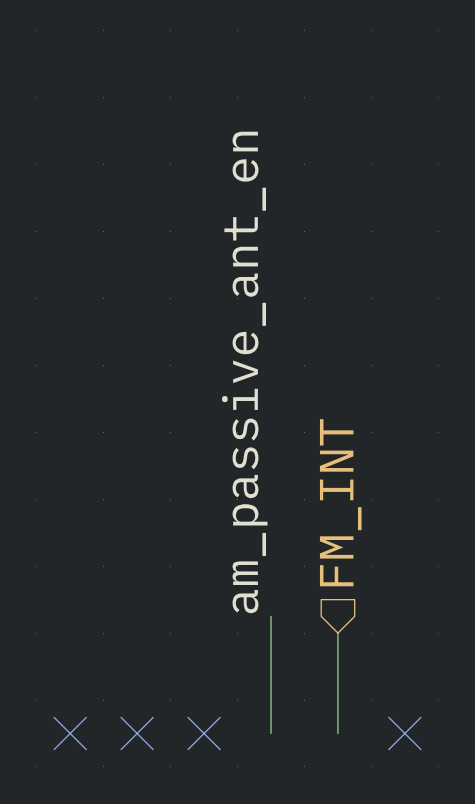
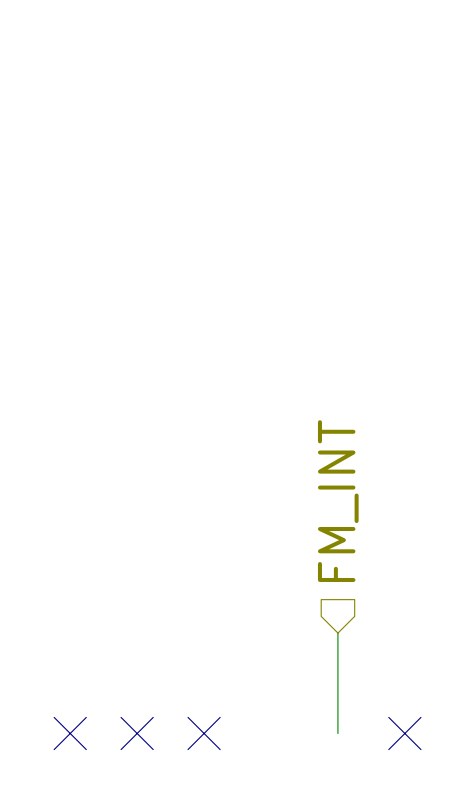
label: am_passive_ant_en (244, 372) -> none
wire: (271, 616) (271, 733) -> none

